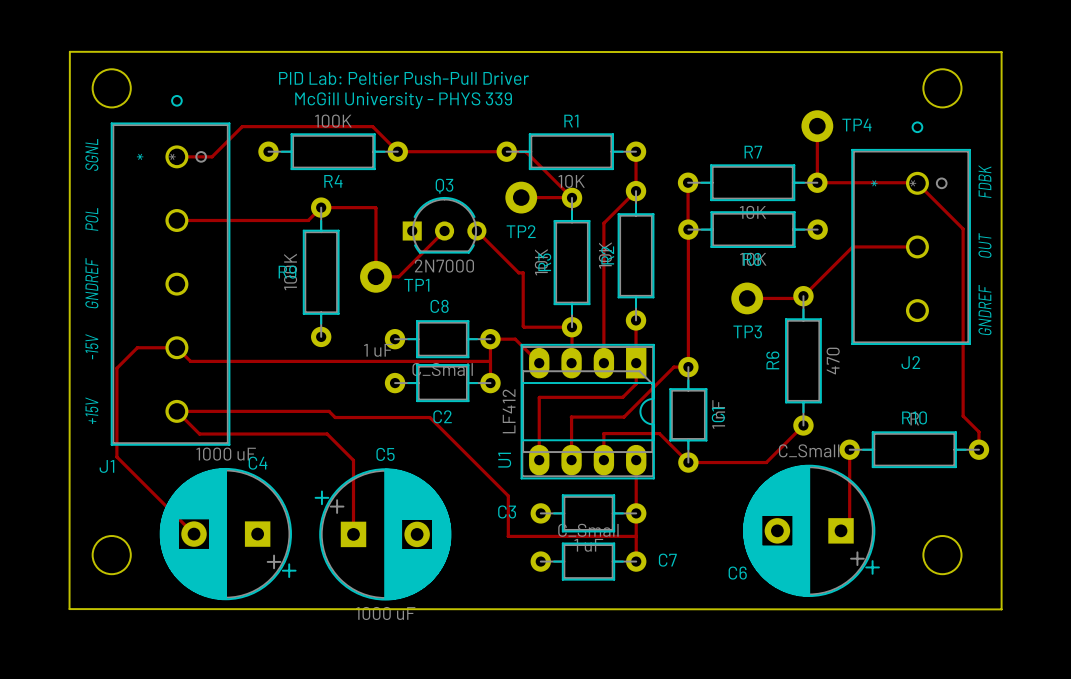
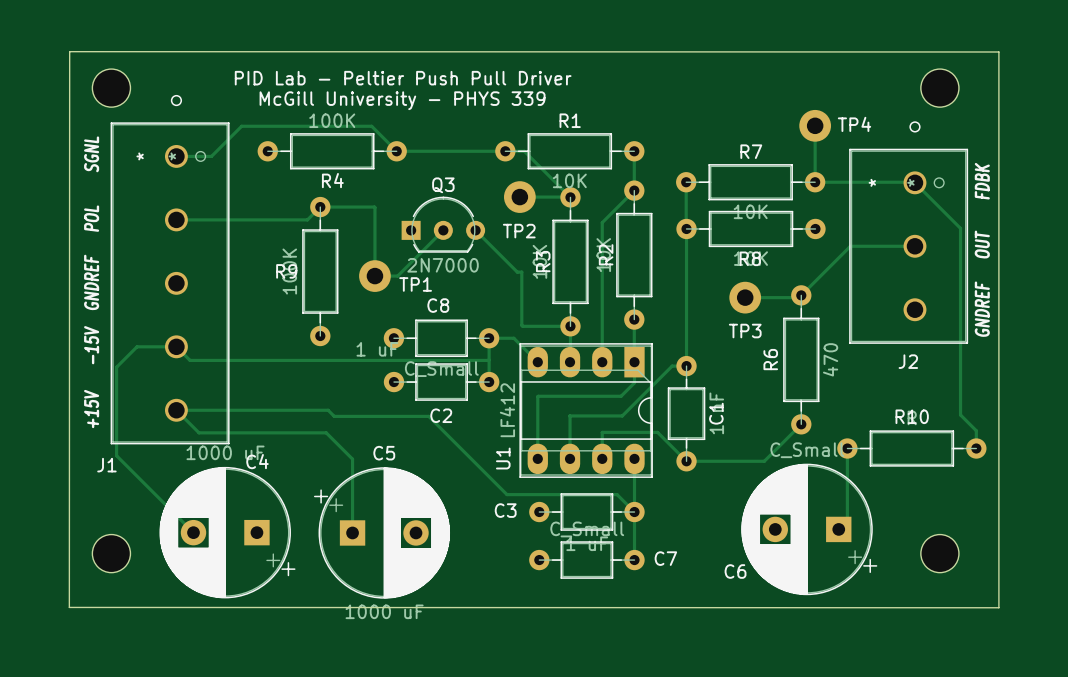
text: PID Lab: Peltier Push-Pull Driver (403, 78) -> PID Lab - Peltier Push Pull Driver (403, 78)
track: (508, 495) (508, 536) (636, 536) -> (506, 494) (617, 494) (634, 512)

